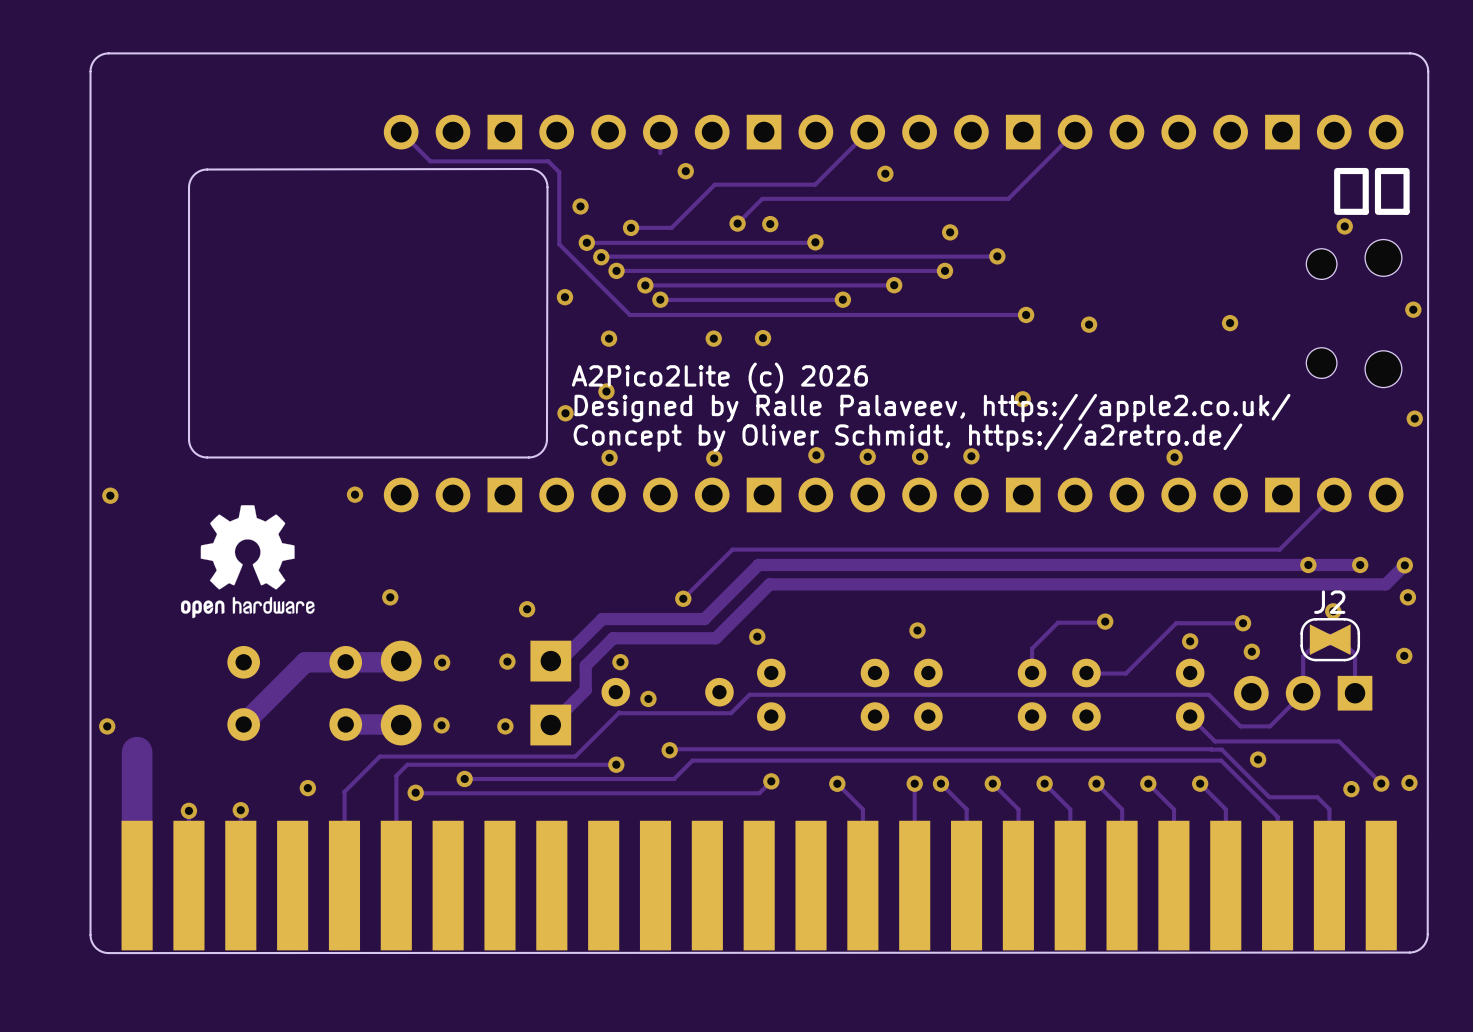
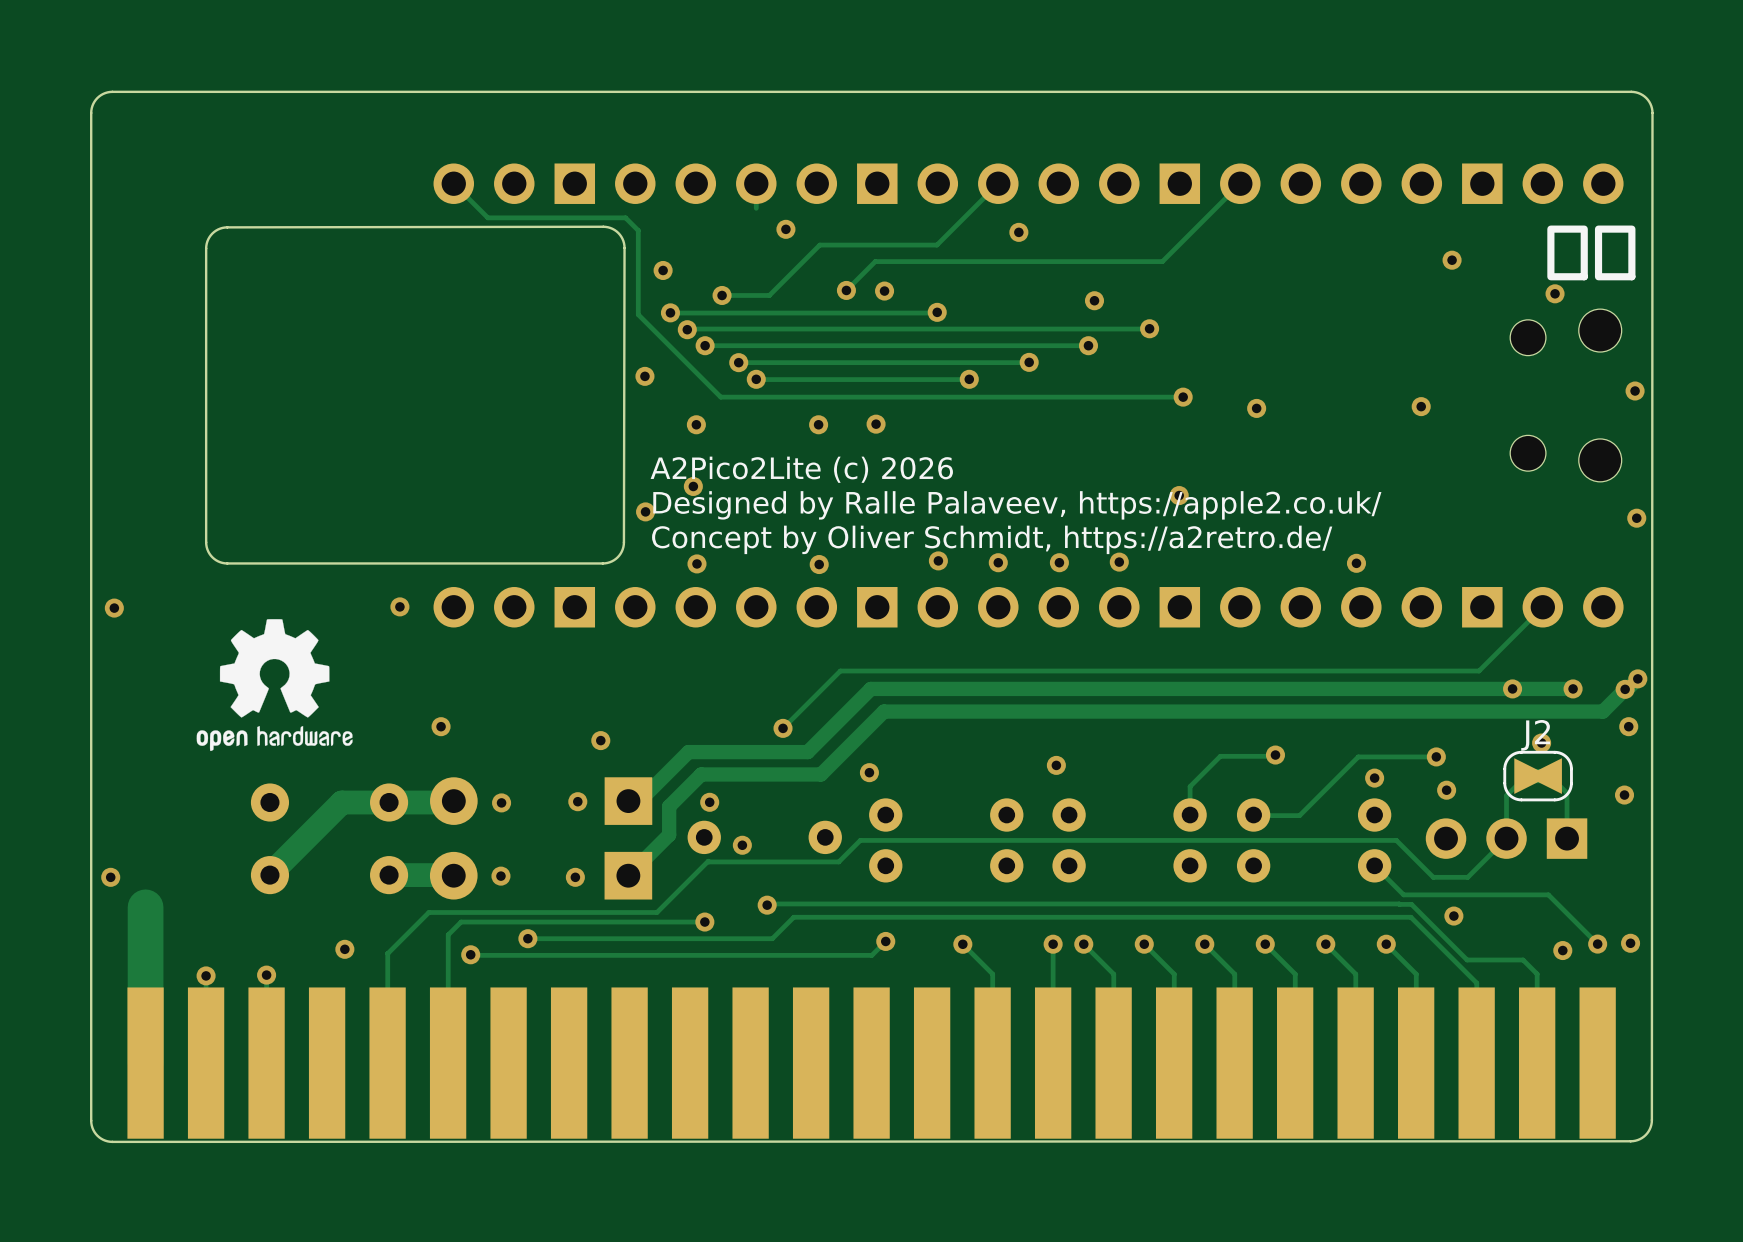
via: none -> (1452, 260)
via: none -> (1637, 678)

